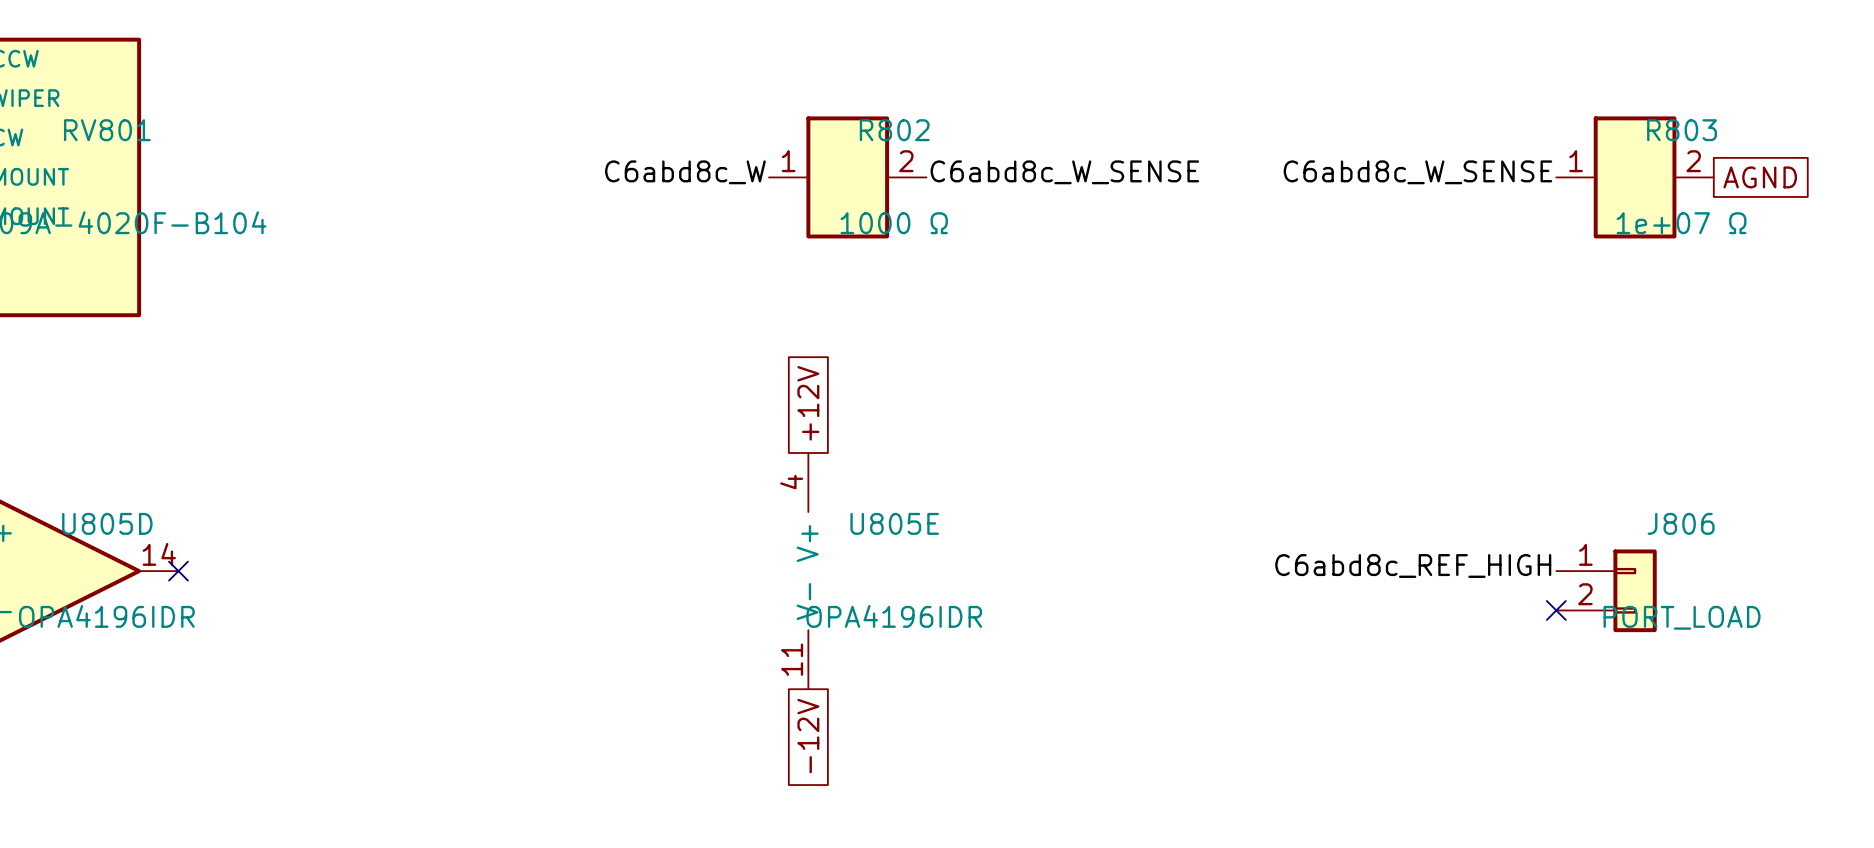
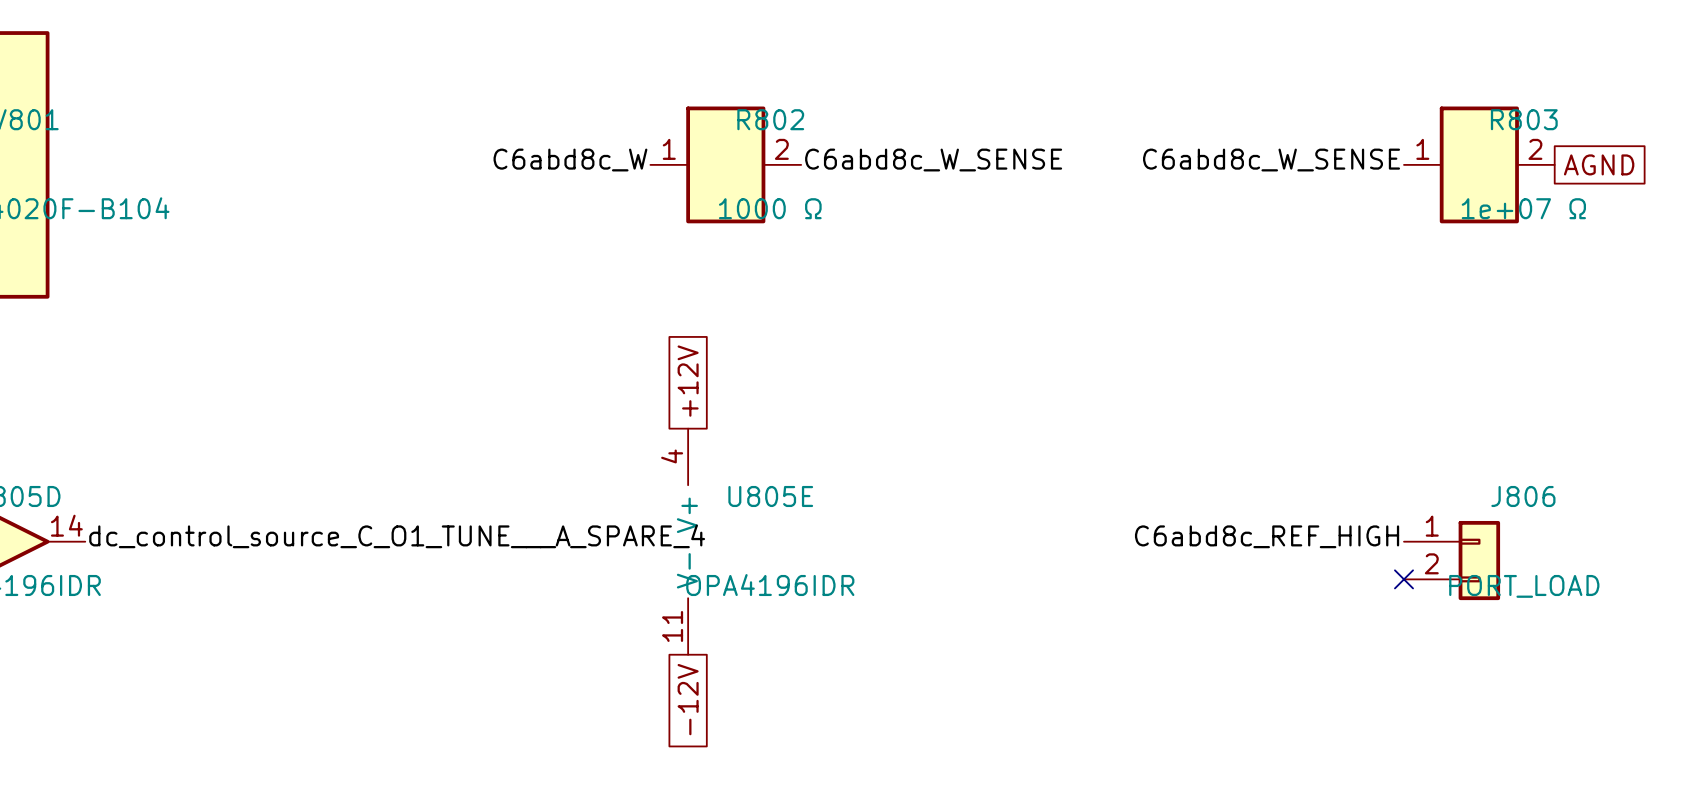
label: none -> dc_control_source_C_O1_TUNE___A_SPARE_4 (397, 536)
no-connect mark: (178, 571) -> none

